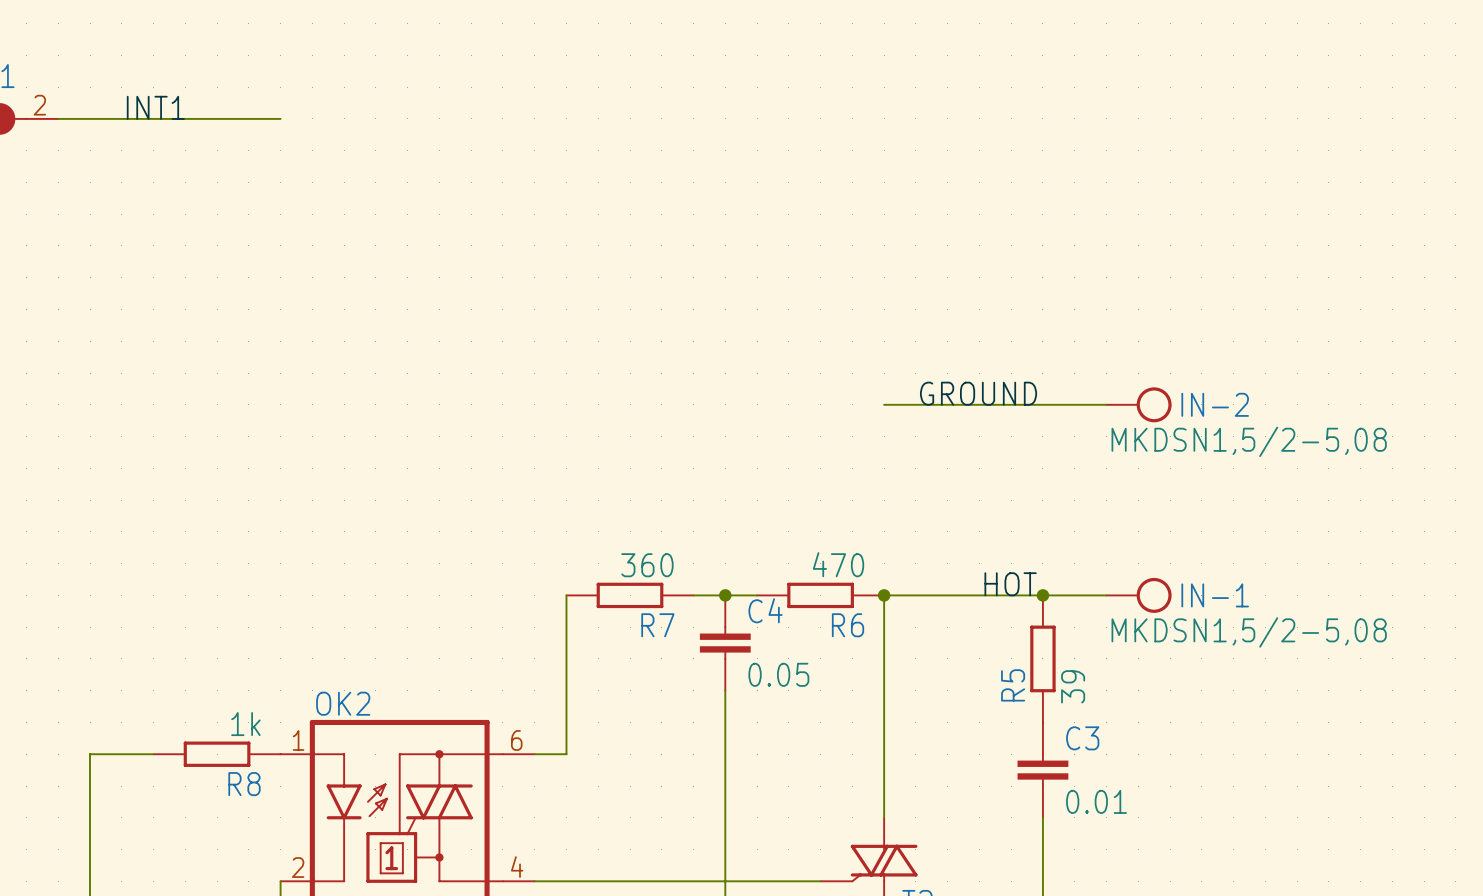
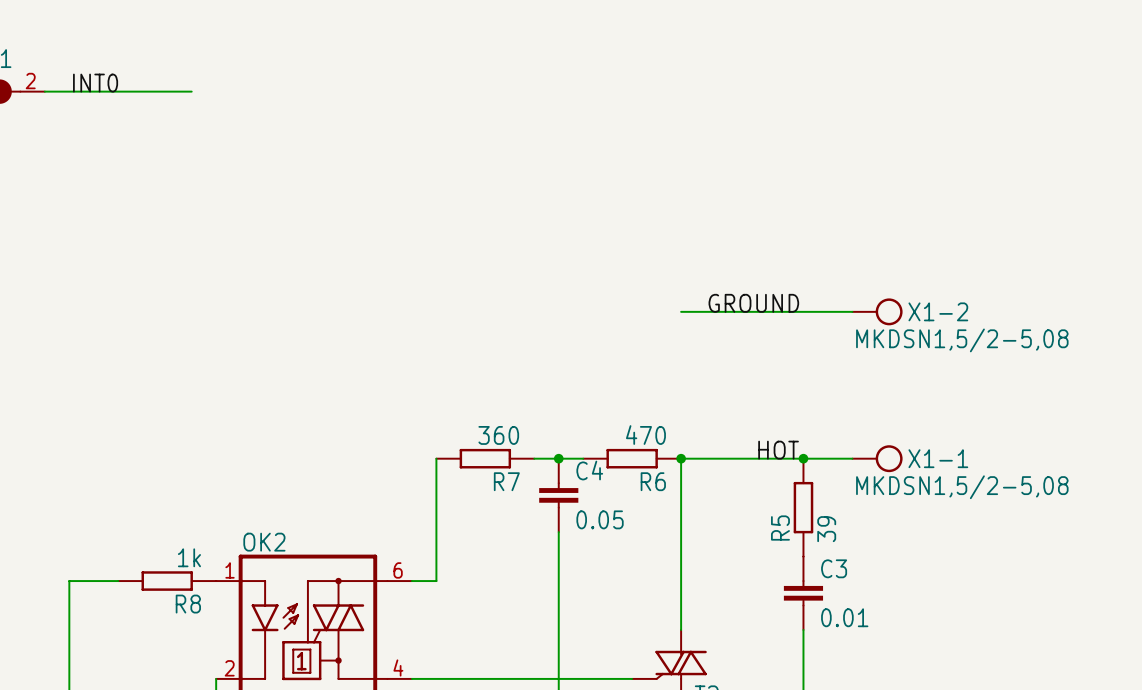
label: INT1 (155, 107) -> INT0 (95, 83)
wire: (248, 118) (280, 118) -> none
IN-2 name: IN-2 (1215, 404) -> X1-2 (938, 311)
IN-1 name: IN-1 (1215, 595) -> X1-1 (938, 458)

